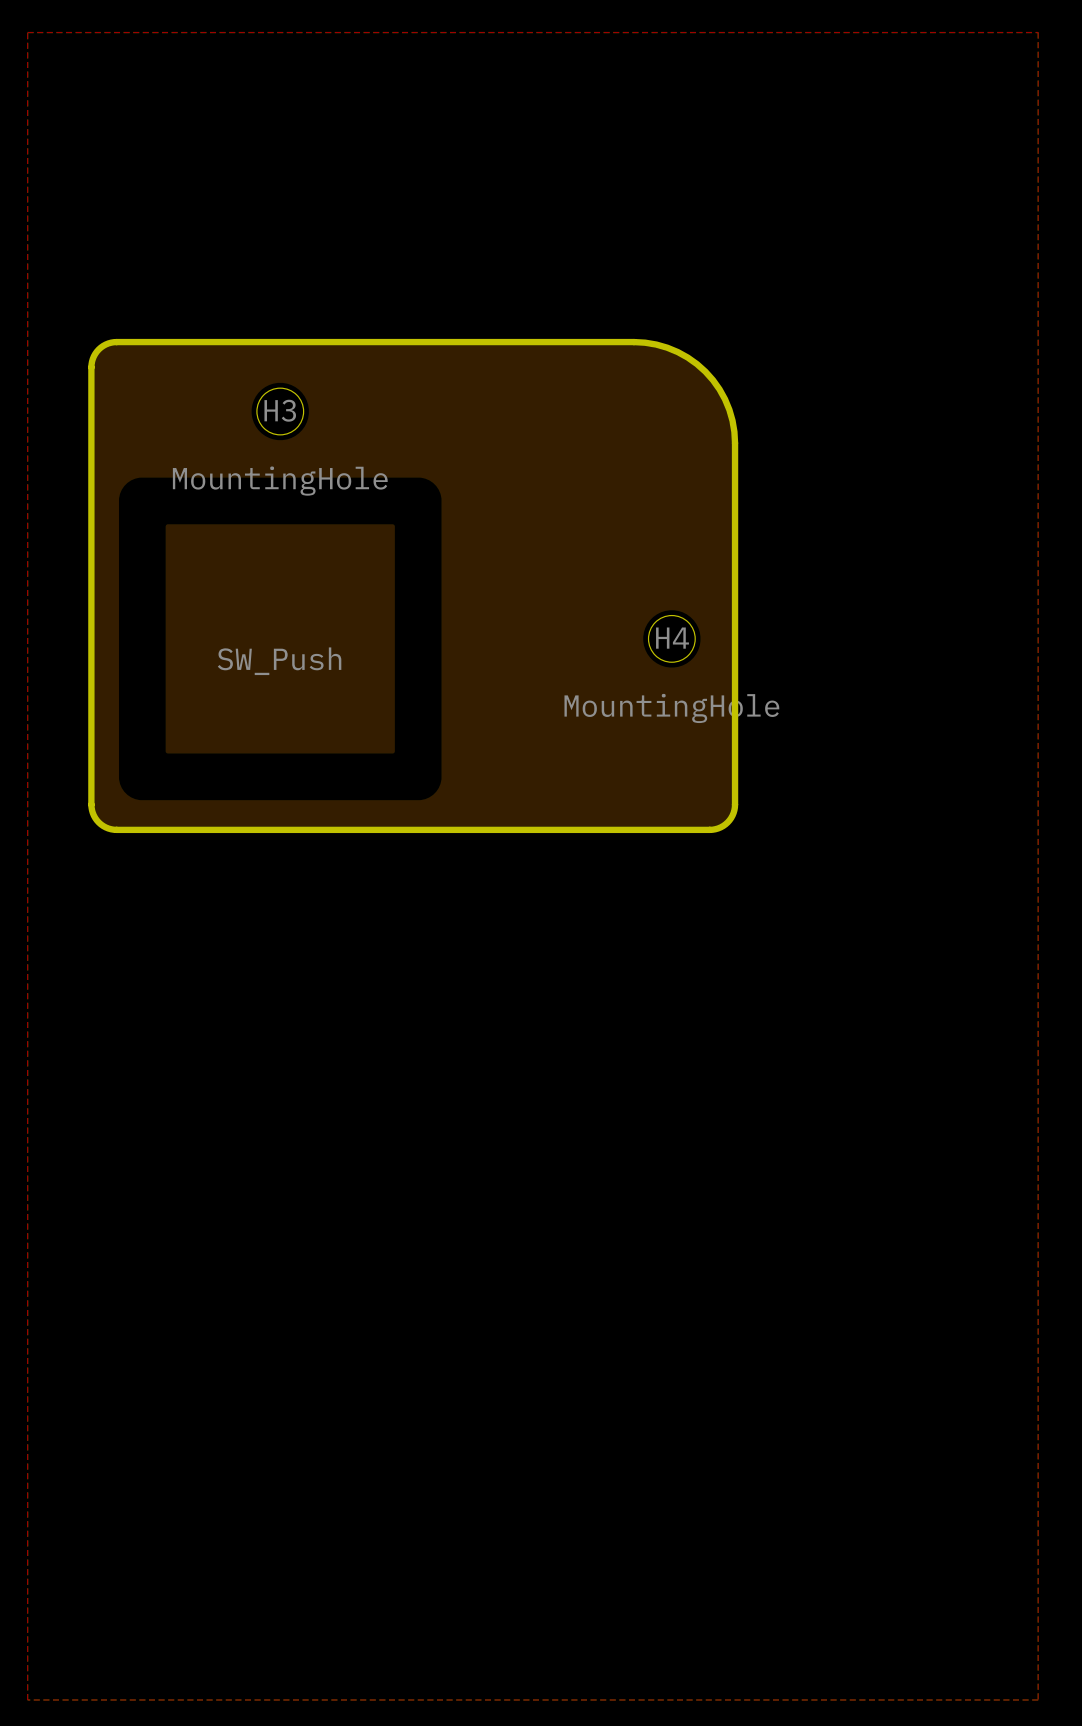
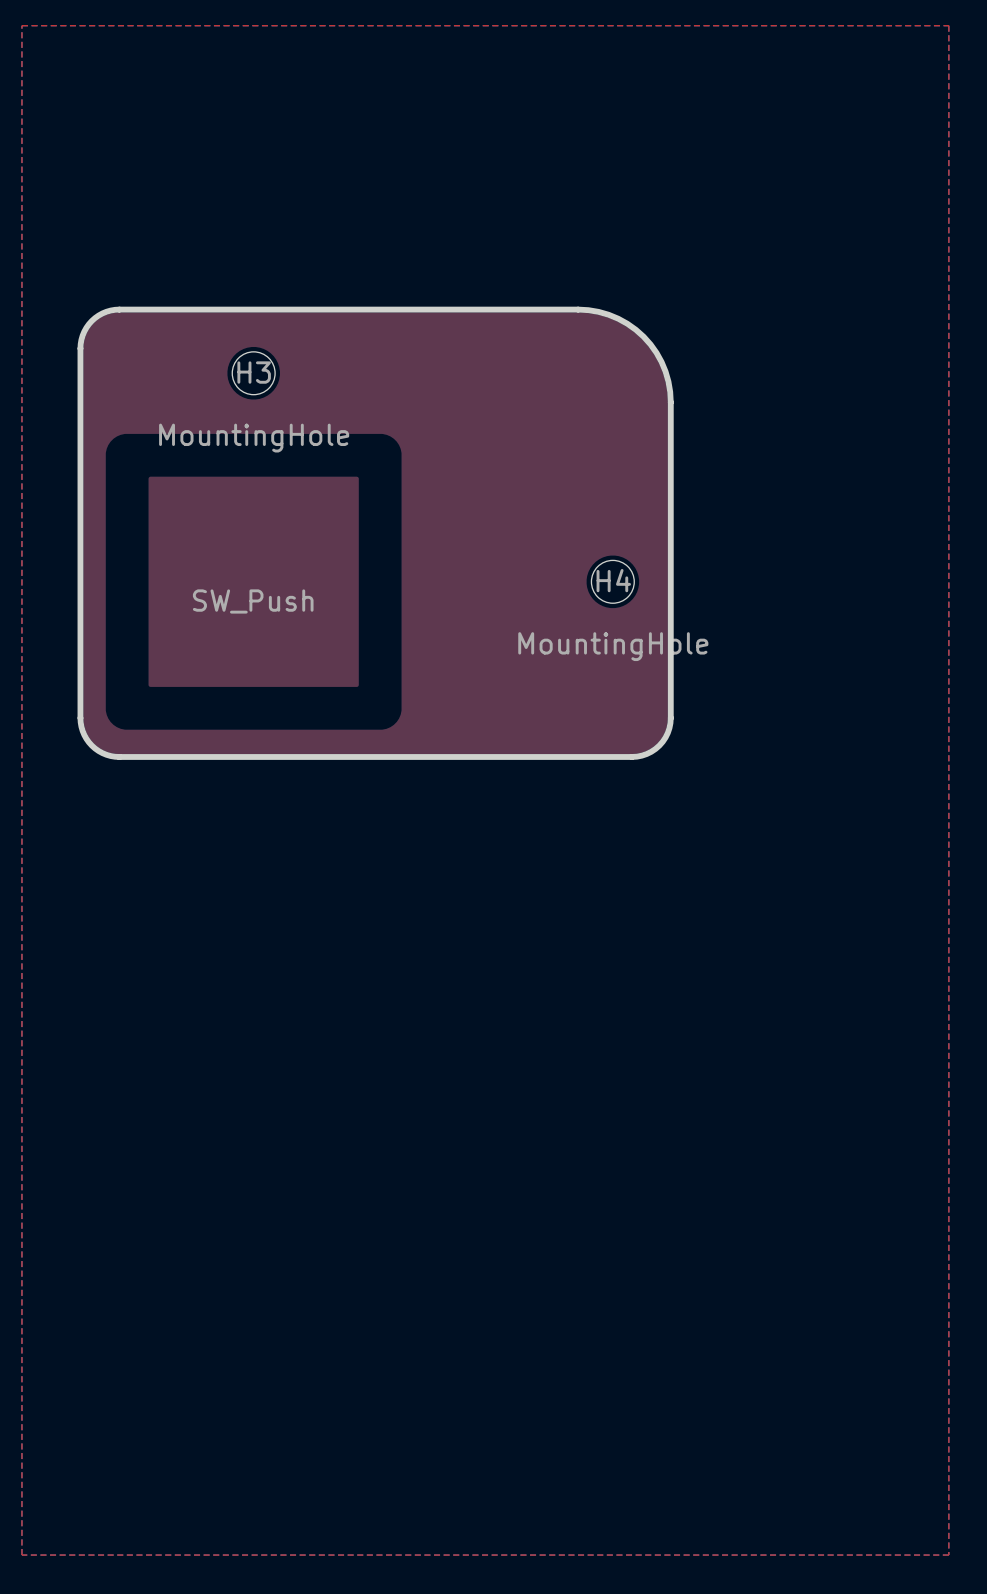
drawing shape: [88, 338, 739, 834] -> [77, 306, 674, 760]

